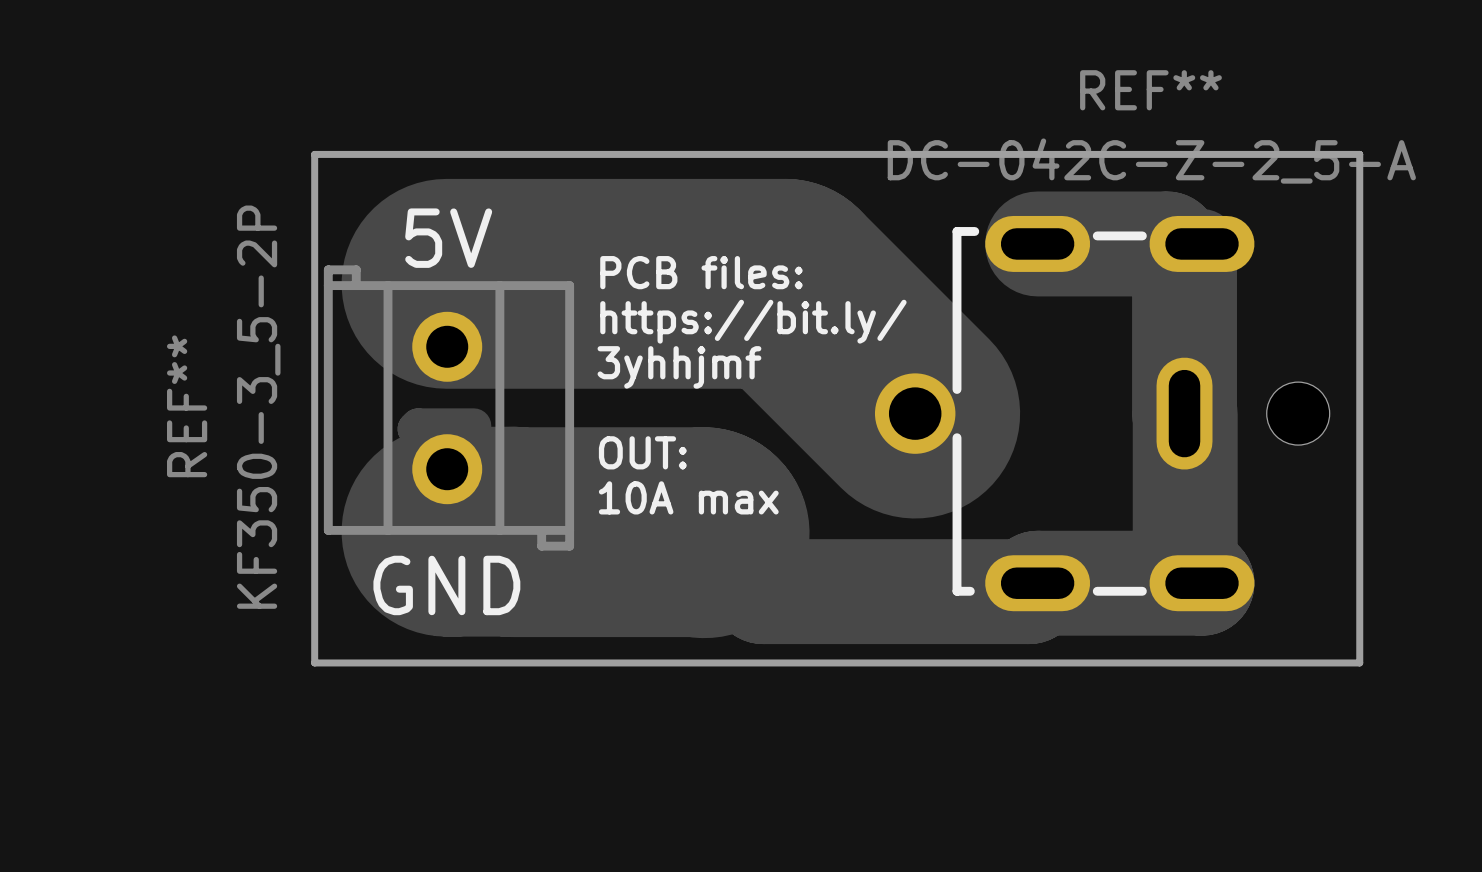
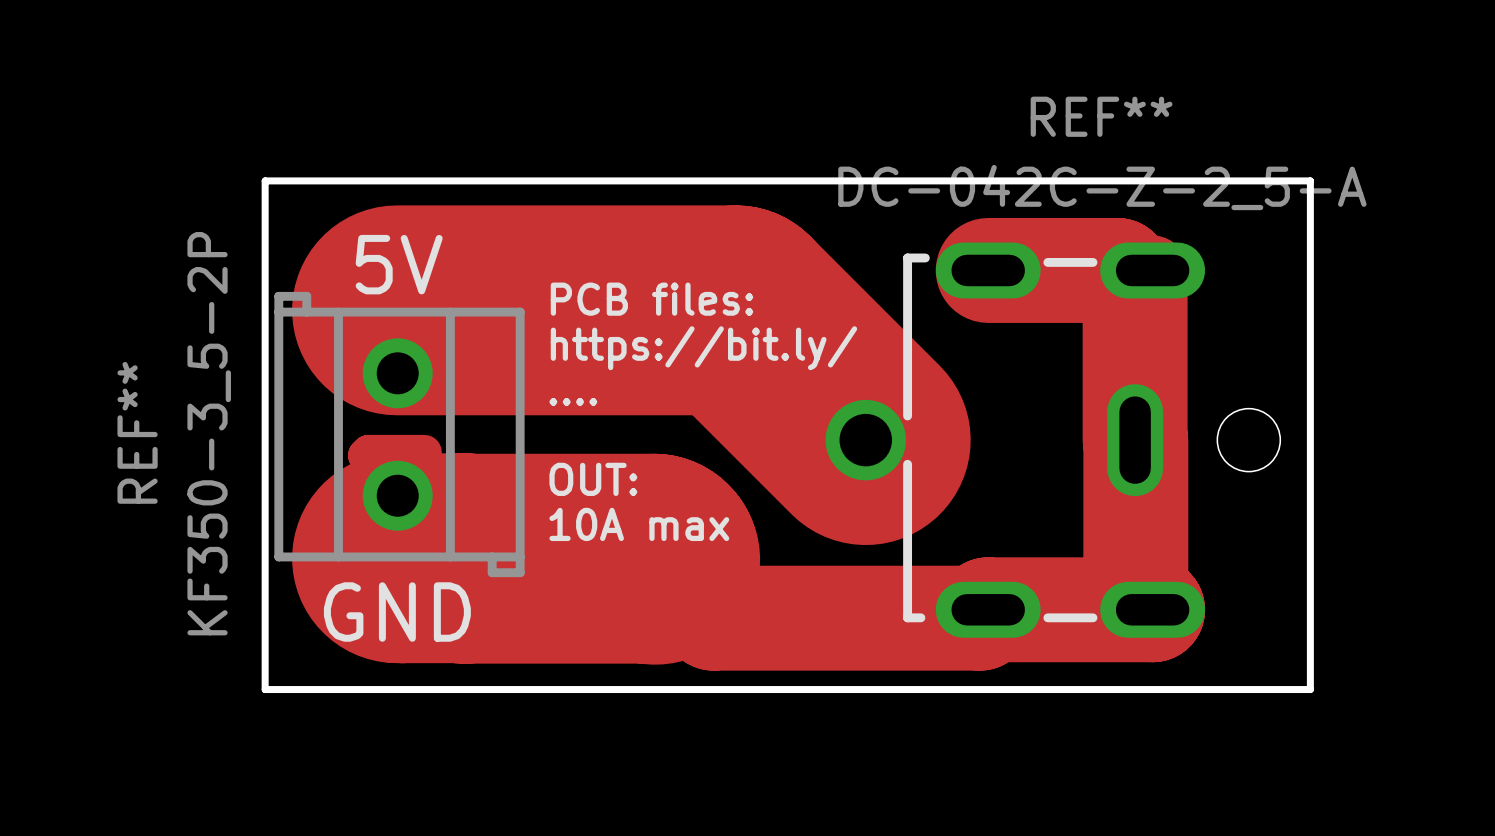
text: 3yhhjmf (679, 367) -> .... (573, 401)

